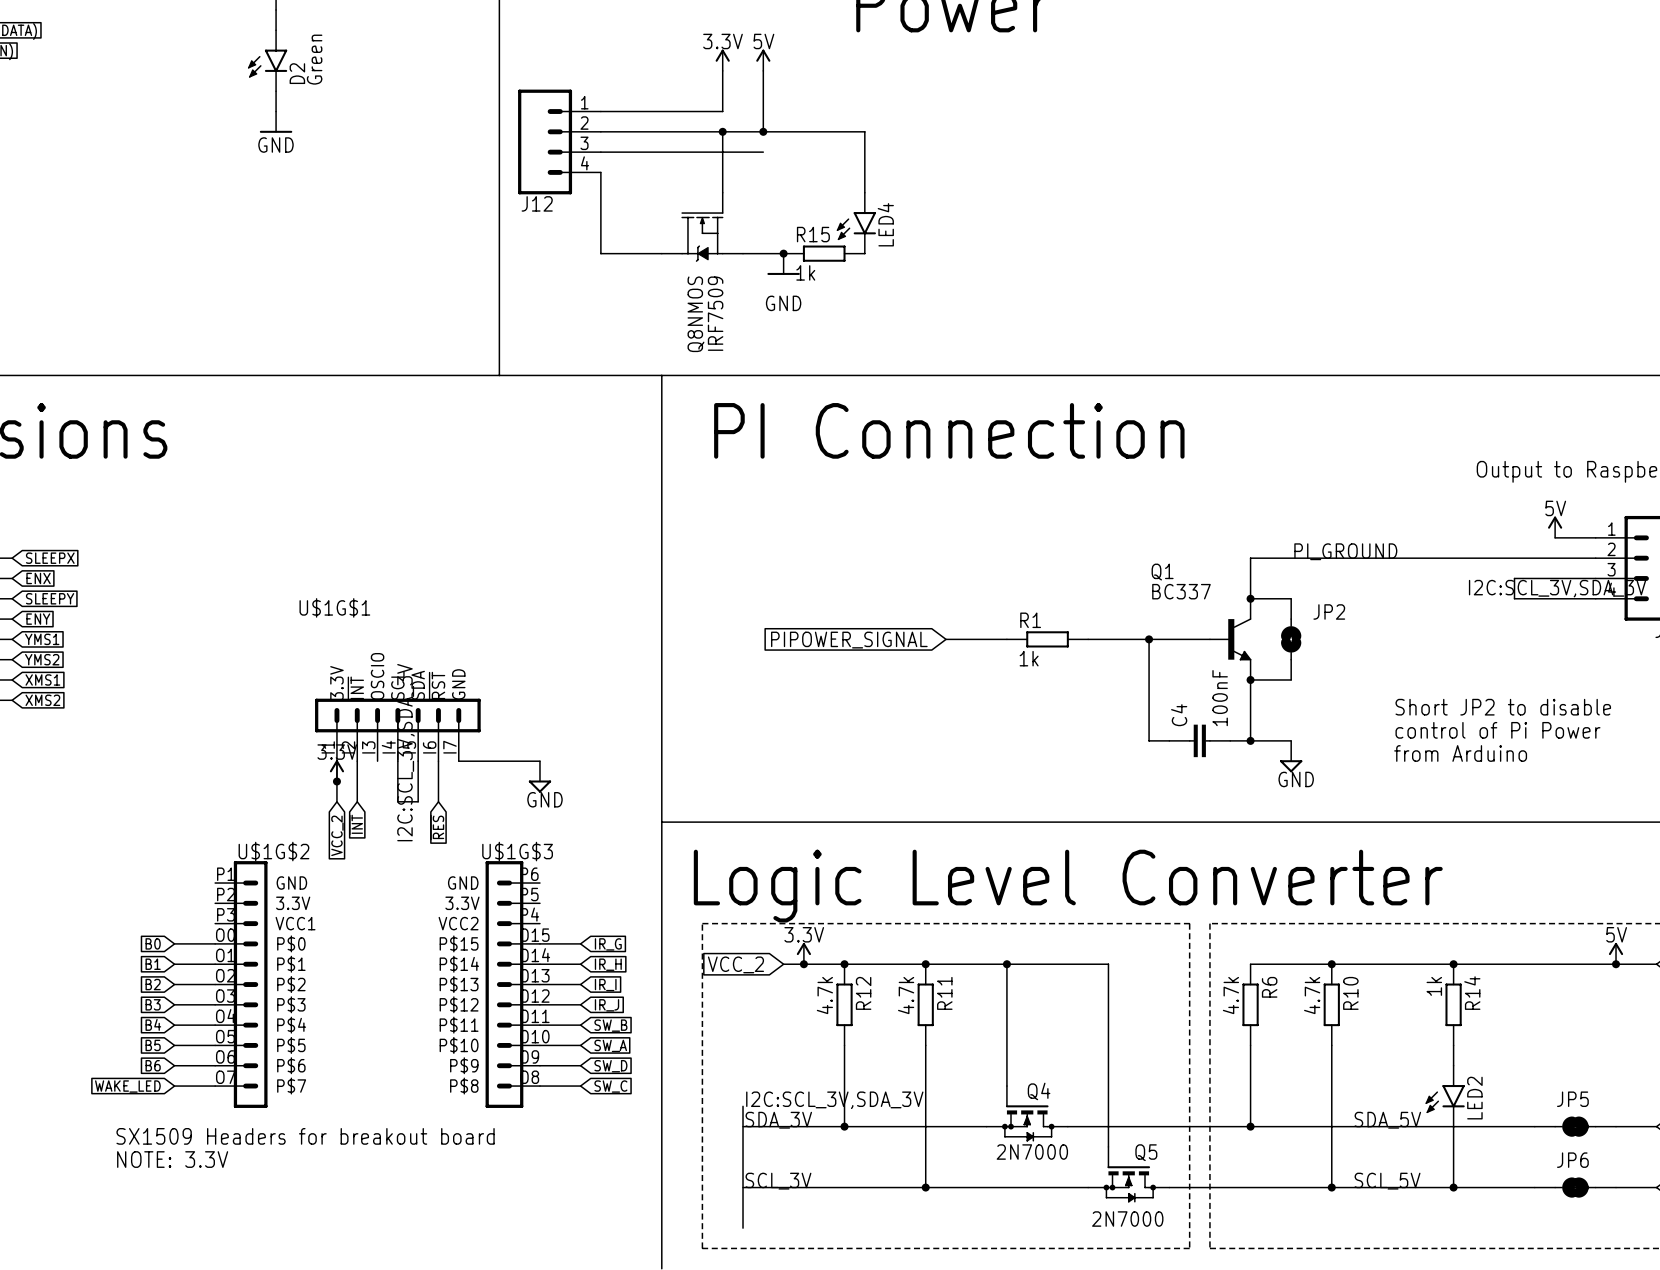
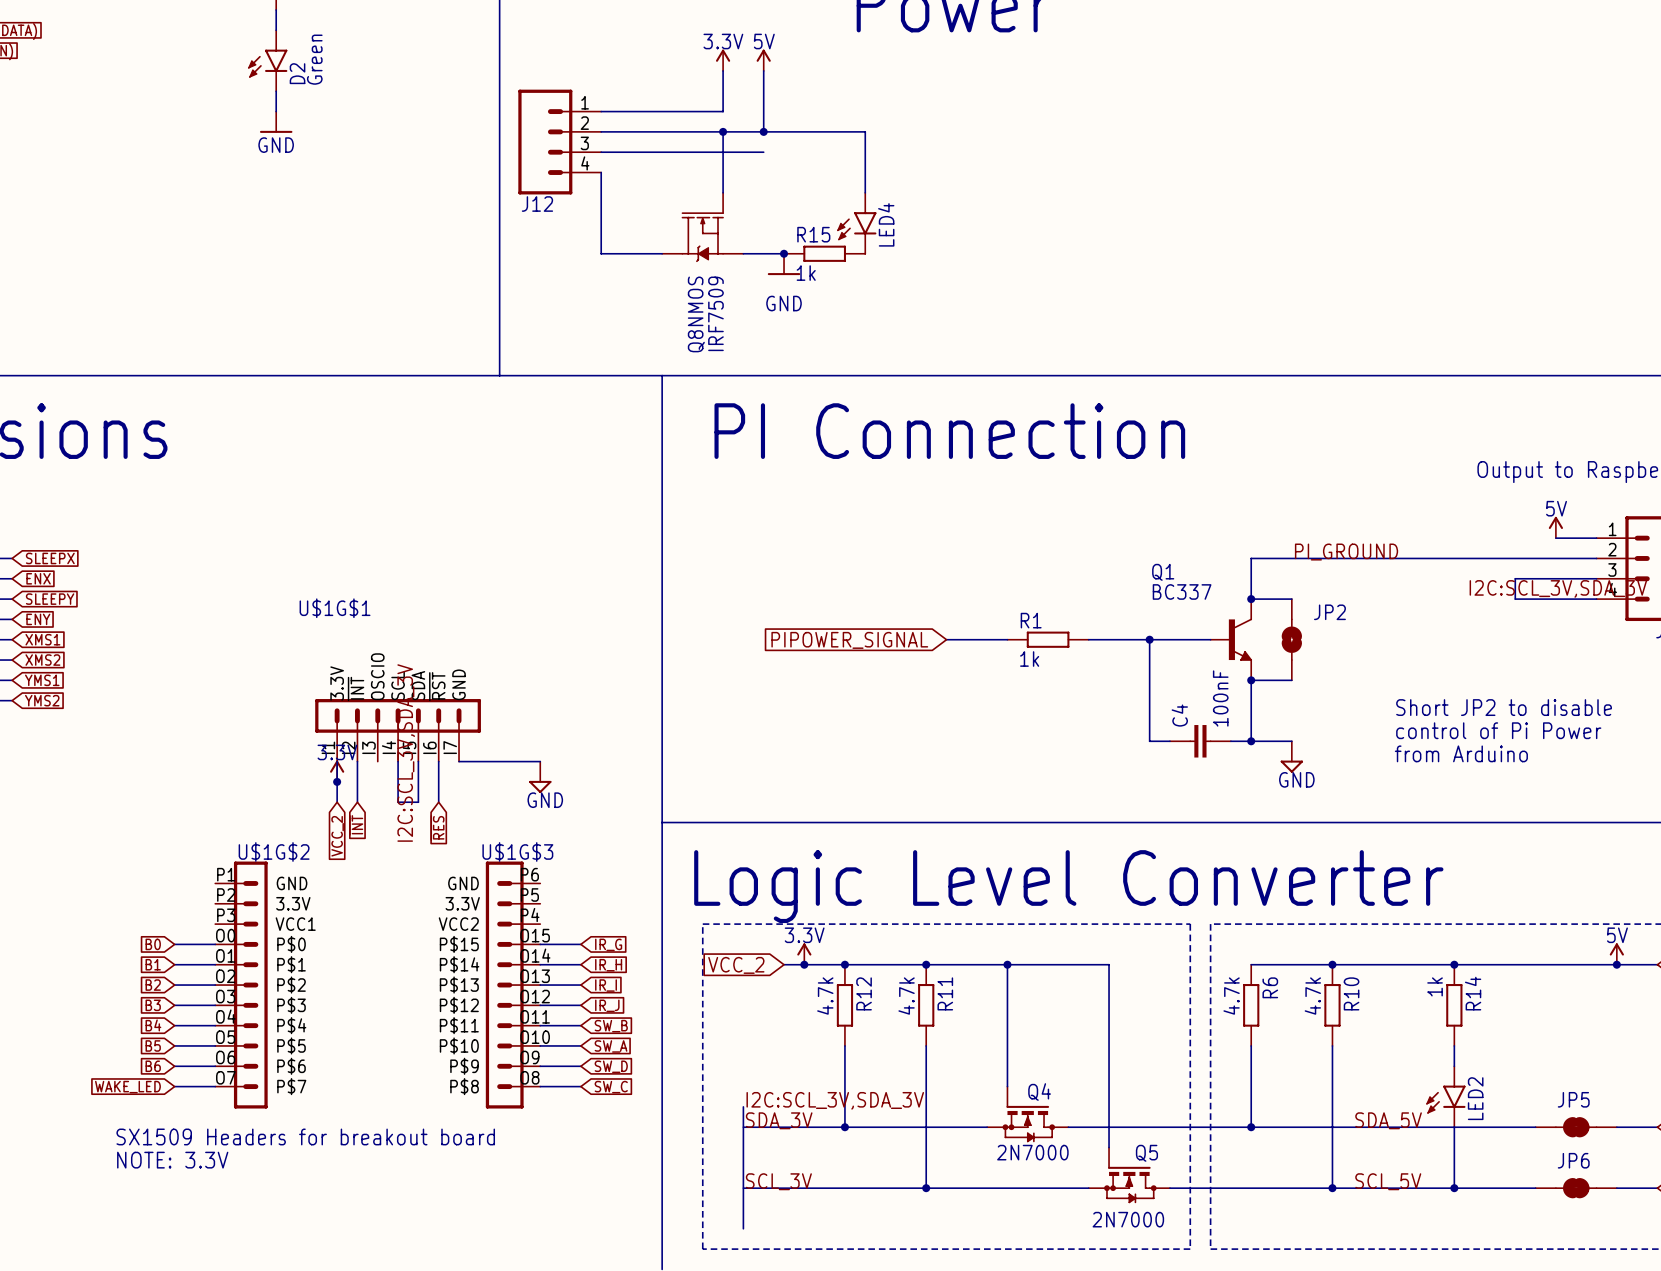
global label: YMS1 (42, 639) -> XMS1 (42, 639)
global label: YMS2 (42, 659) -> XMS2 (42, 660)
global label: XMS1 (42, 679) -> YMS1 (42, 680)
global label: XMS2 (42, 700) -> YMS2 (42, 700)

